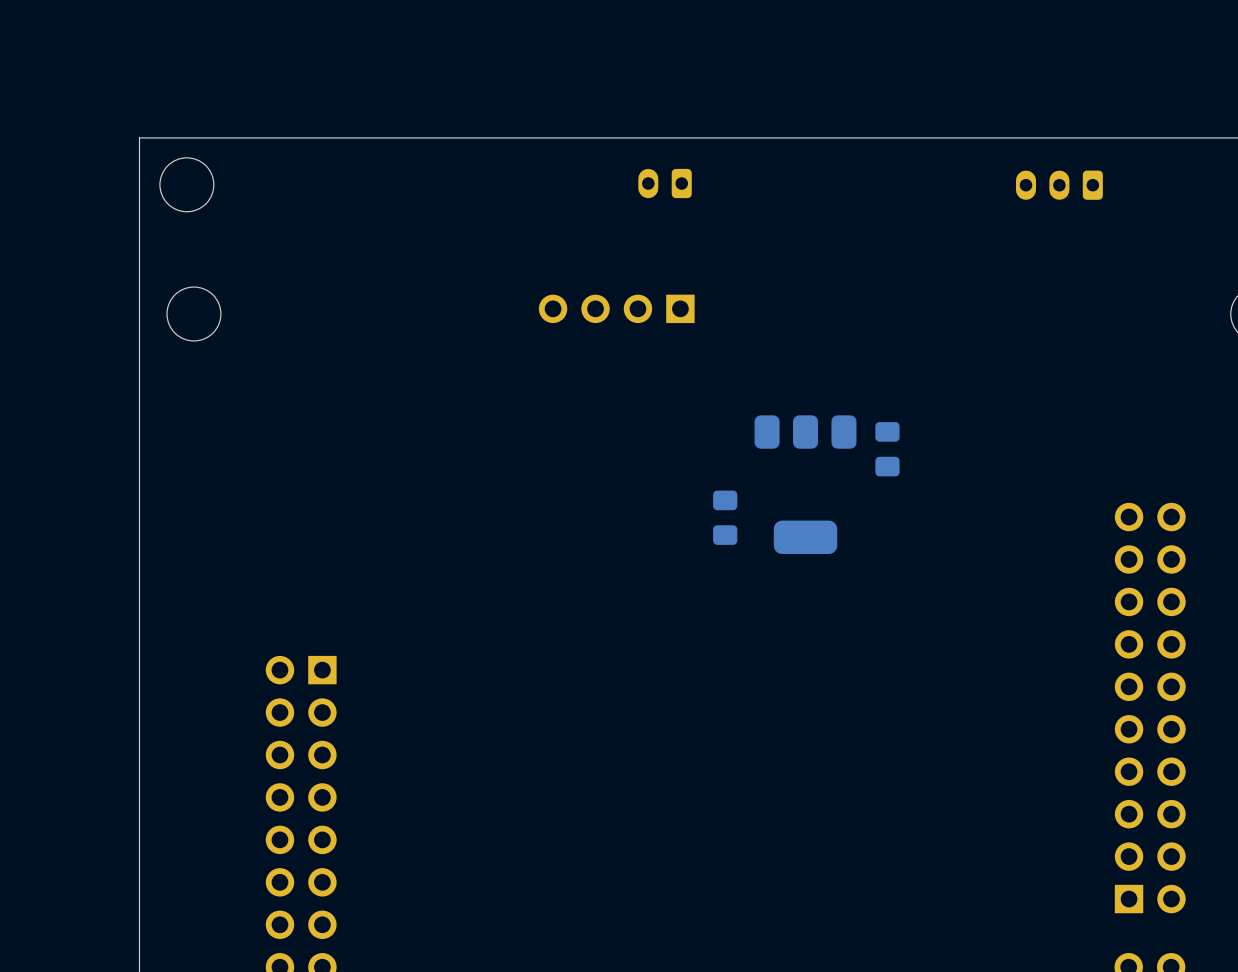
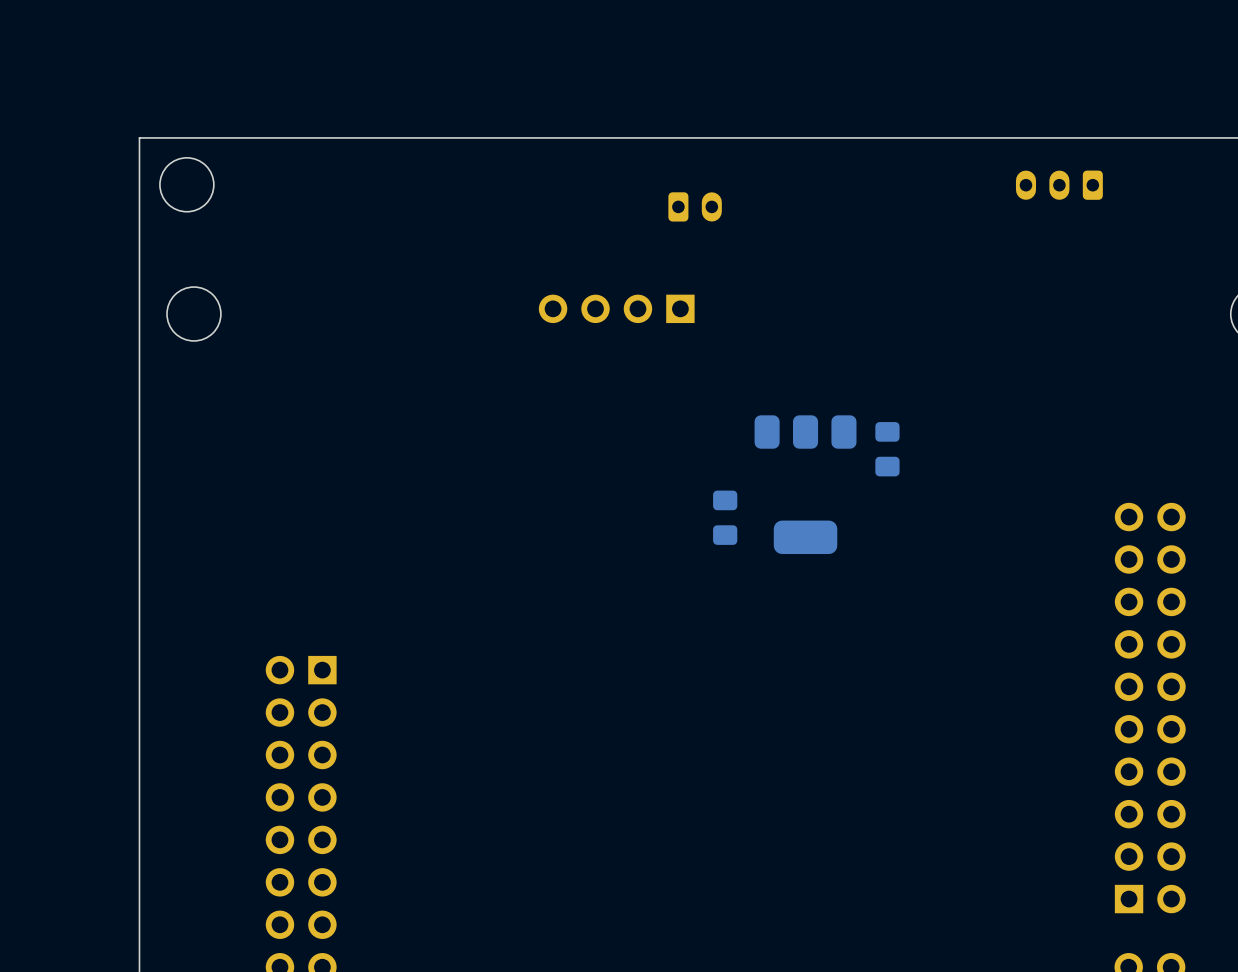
part rotation: 0° (665, 183) -> 180° (695, 206)
part position: (665, 183) -> (695, 206)

